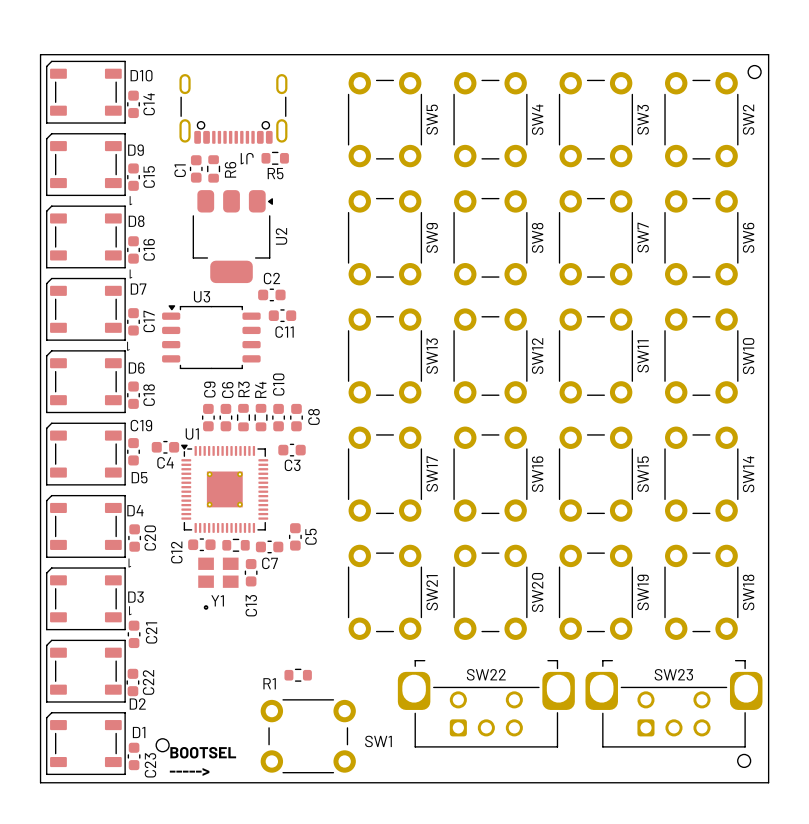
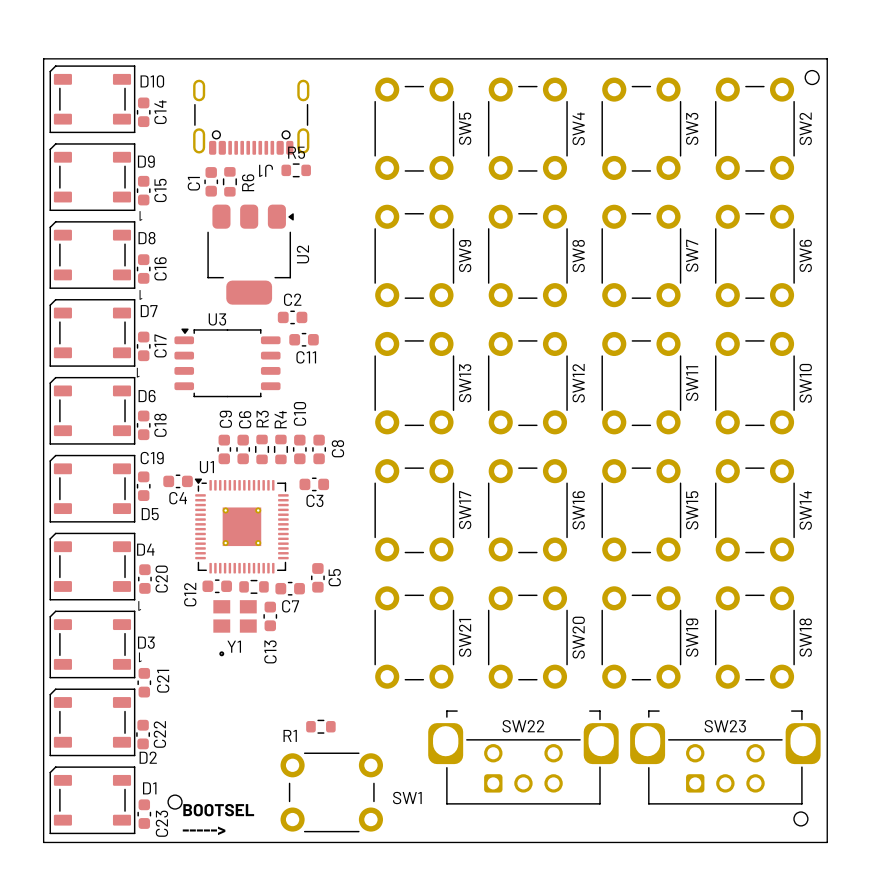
R5 name position: R5 (275, 173) -> R5 (296, 152)

